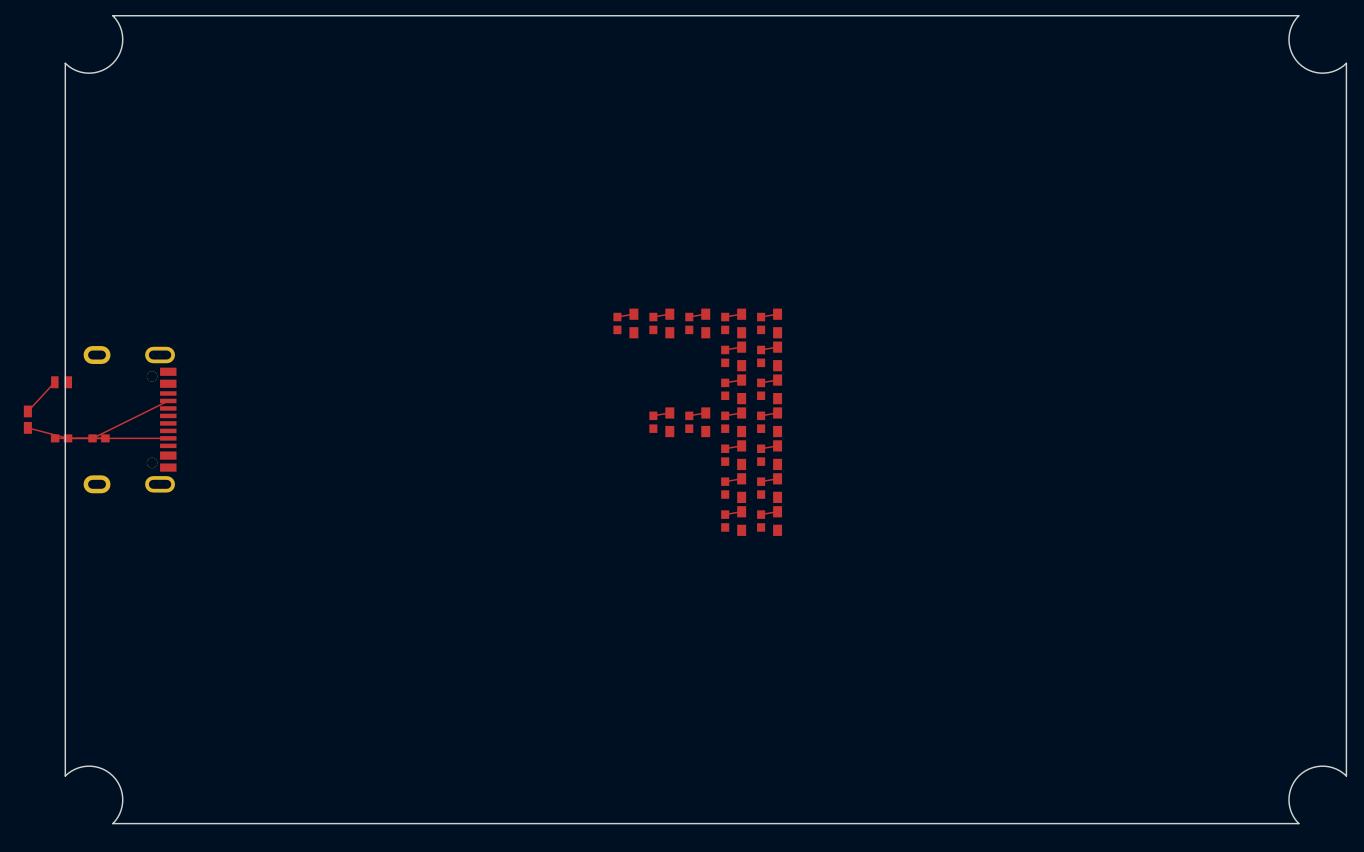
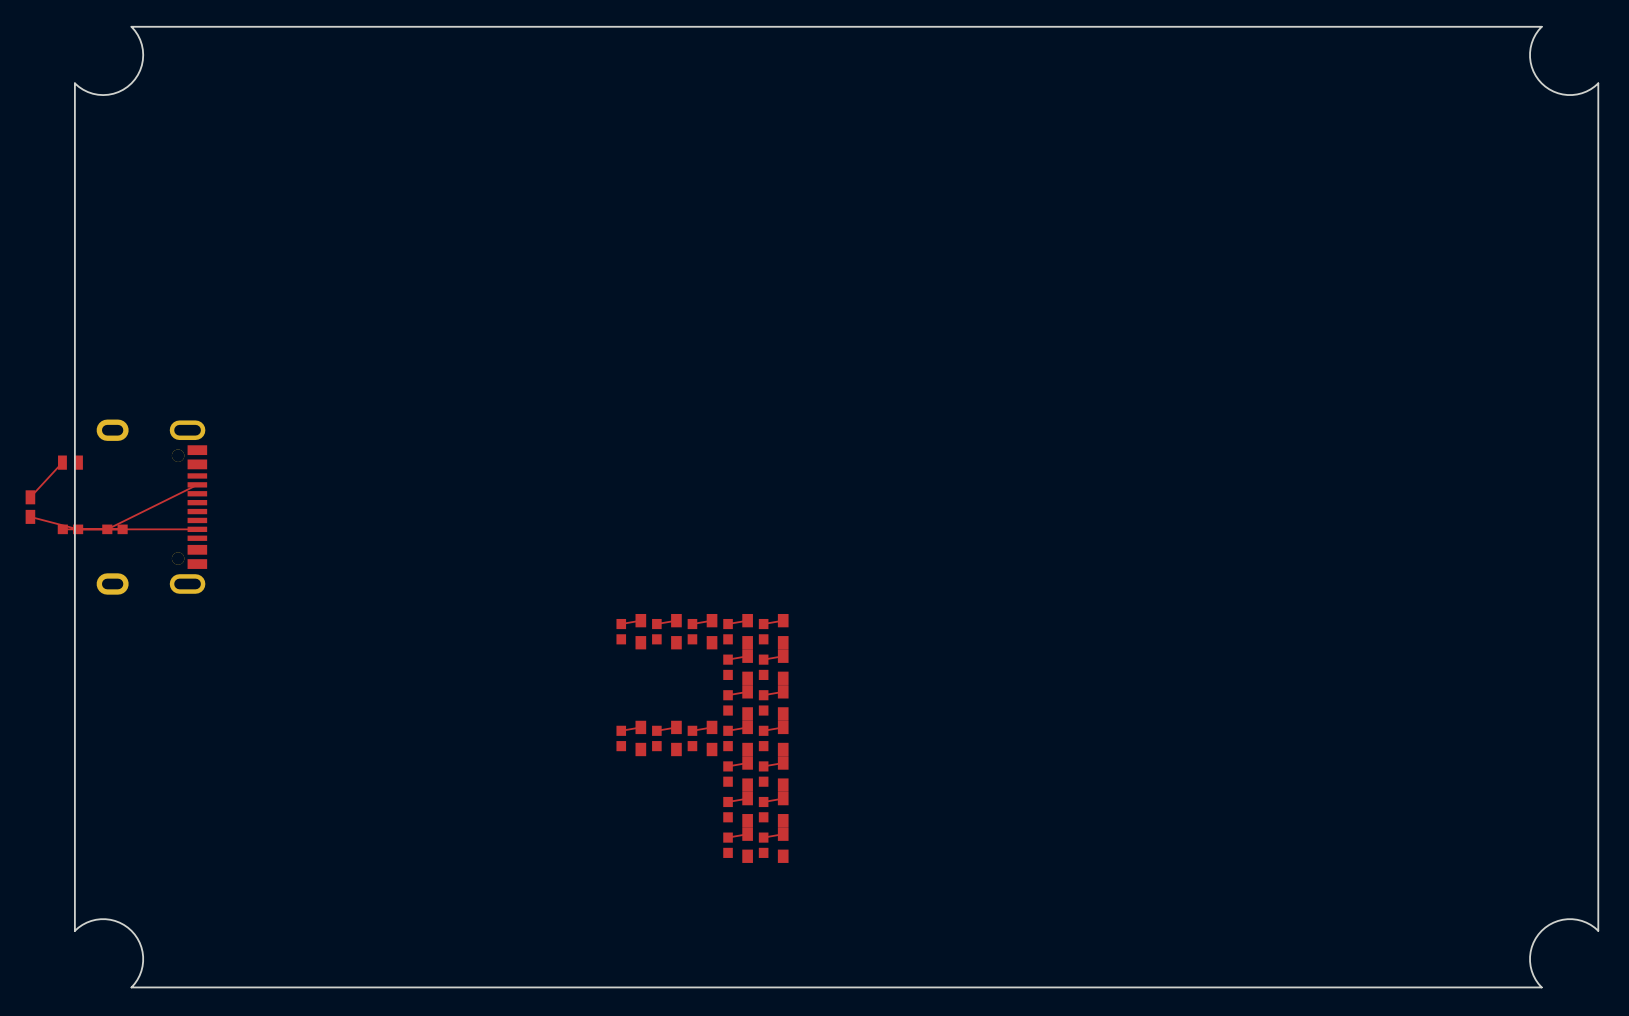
top track: (633, 314) (617, 317) -> (640, 620) (621, 624)
top track: (669, 314) (653, 317) -> (676, 727) (656, 730)
top track: (705, 314) (689, 317) -> (640, 727) (621, 730)
top track: (741, 314) (725, 317) -> (747, 798) (728, 801)
top track: (777, 314) (761, 317) -> none
part: (617, 323) -> none
part: (633, 323) -> none
part: (653, 323) -> none
part: (669, 323) -> none
part: (689, 323) -> none
part: (705, 323) -> none
part: (725, 323) -> none
part: (741, 323) -> none
part: (761, 323) -> none
part: (777, 323) -> none
top track: (741, 347) (725, 349) -> (747, 763) (728, 766)
top track: (777, 347) (761, 349) -> (783, 798) (763, 801)
part: (725, 356) -> none
part: (741, 356) -> none
part: (761, 356) -> none
part: (777, 356) -> none
top track: (741, 380) (725, 382) -> (712, 727) (692, 730)
top track: (777, 380) (761, 382) -> (783, 763) (763, 766)
part: (725, 389) -> none
part: (741, 389) -> none
part: (761, 389) -> none
part: (777, 389) -> none
top track: (669, 412) (653, 415) -> (747, 620) (728, 624)
top track: (705, 412) (689, 415) -> (712, 620) (692, 624)
top track: (741, 412) (725, 415) -> (676, 620) (656, 624)
top track: (777, 412) (761, 415) -> (747, 727) (728, 730)
part: (653, 422) -> none
part: (669, 422) -> none
part: (689, 422) -> none
part: (705, 422) -> none
part: (725, 422) -> none
part: (741, 422) -> none
part: (761, 422) -> none
part: (777, 422) -> none
top track: (741, 445) (725, 448) -> (747, 656) (728, 659)
top track: (777, 445) (761, 448) -> (747, 691) (728, 695)
part: (725, 455) -> none
part: (741, 455) -> none
part: (761, 455) -> none
part: (777, 455) -> none
top track: (741, 478) (725, 481) -> (783, 656) (763, 659)
top track: (777, 478) (761, 481) -> (783, 727) (763, 730)
part: (725, 488) -> none
part: (741, 488) -> none
part: (761, 488) -> none
part: (777, 488) -> none
top track: (741, 511) (725, 514) -> (783, 620) (763, 624)
top track: (777, 511) (761, 514) -> (783, 691) (763, 695)
part: (725, 521) -> none
part: (741, 521) -> none
part: (761, 521) -> none
part: (777, 521) -> none
part: none -> (621, 631)
part: none -> (640, 631)
part: none -> (656, 631)
part: none -> (676, 631)
part: none -> (692, 631)
part: none -> (712, 631)
part: none -> (728, 631)
part: none -> (747, 631)
part: none -> (763, 631)
part: none -> (783, 631)
part: none -> (728, 667)
part: none -> (747, 667)
part: none -> (763, 667)
part: none -> (783, 667)
part: none -> (728, 702)
part: none -> (747, 702)
part: none -> (763, 702)
part: none -> (783, 702)
part: none -> (621, 738)
part: none -> (640, 738)
part: none -> (656, 738)
part: none -> (676, 738)
part: none -> (692, 738)
part: none -> (712, 738)
part: none -> (728, 738)
part: none -> (747, 738)
part: none -> (763, 738)
part: none -> (783, 738)
part: none -> (728, 774)
part: none -> (747, 774)
part: none -> (763, 774)
part: none -> (783, 774)
part: none -> (728, 809)
part: none -> (747, 809)
part: none -> (763, 809)
part: none -> (783, 809)
top track: none -> (747, 834) (728, 837)
top track: none -> (783, 834) (763, 837)
part: none -> (728, 845)
part: none -> (747, 845)
part: none -> (763, 845)
part: none -> (783, 845)

